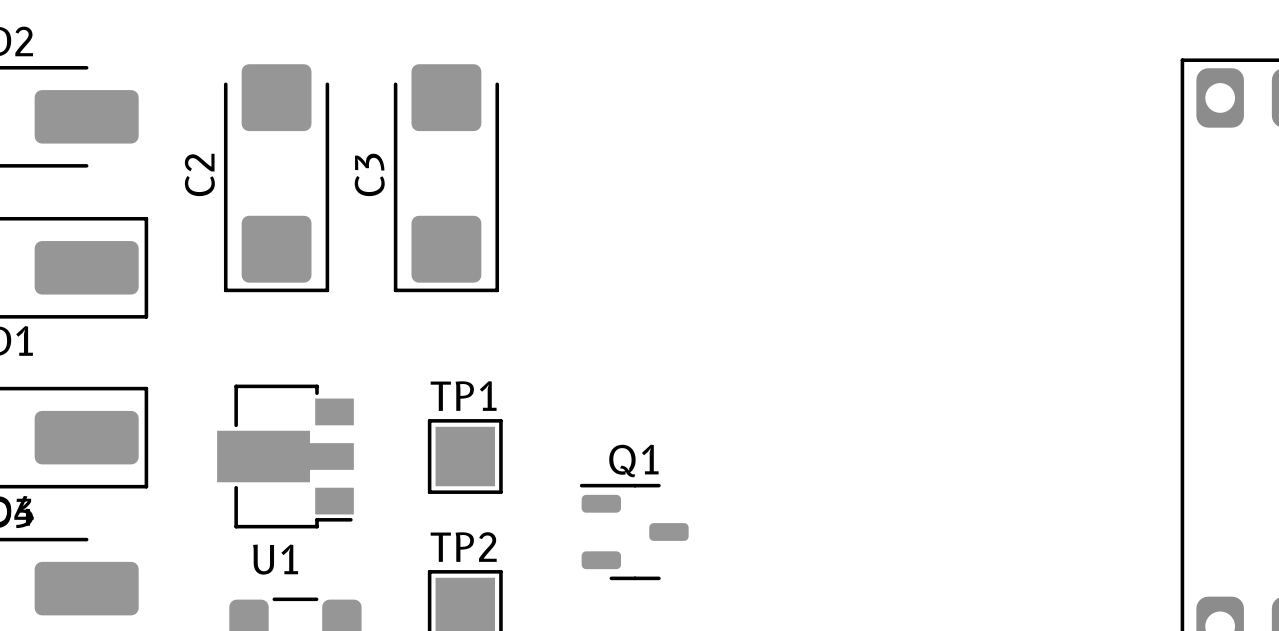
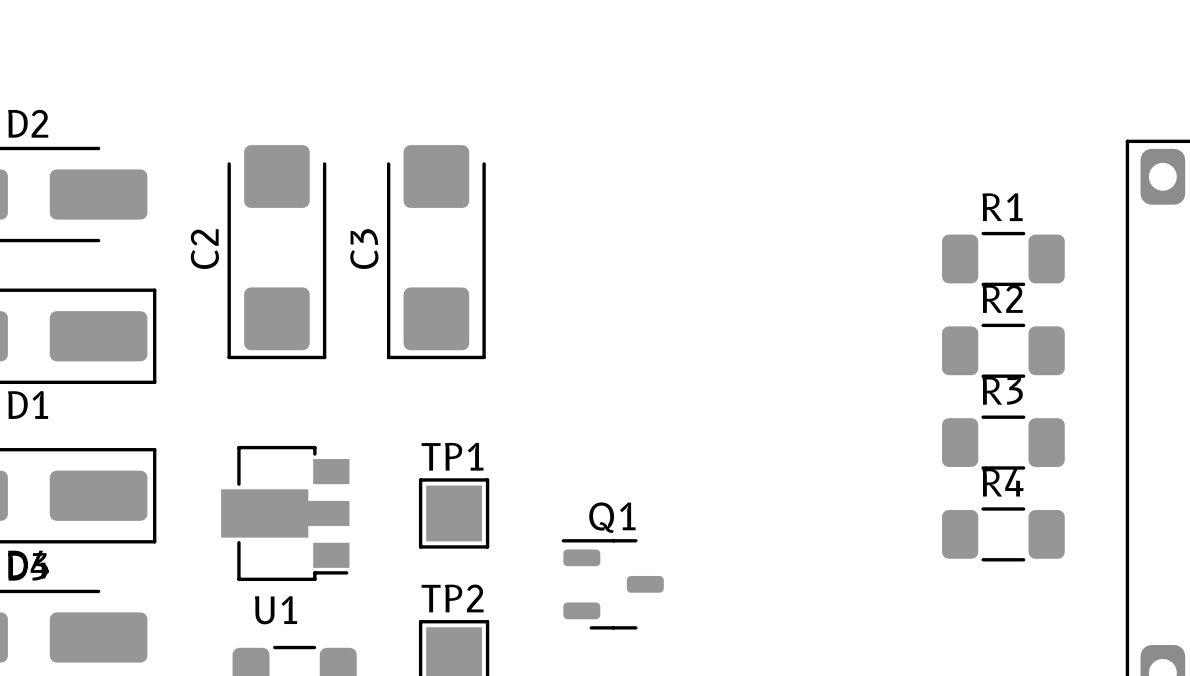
R1: none -> (1003, 258)
R2: none -> (1003, 350)
R3: none -> (1003, 442)
R4: none -> (1003, 534)

